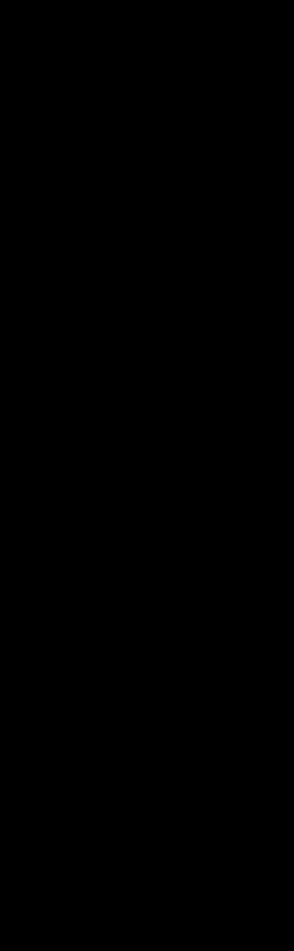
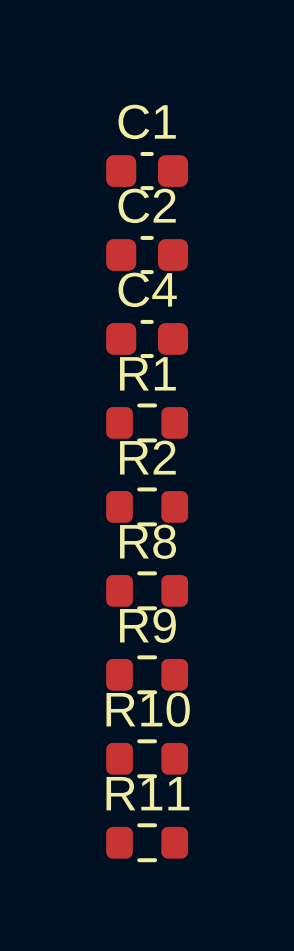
C1: none -> (147, 171)
C2: none -> (147, 255)
C4: none -> (147, 338)
R1: none -> (147, 422)
R2: none -> (147, 506)
R8: none -> (147, 590)
R9: none -> (147, 674)
R10: none -> (147, 758)
R11: none -> (147, 842)

